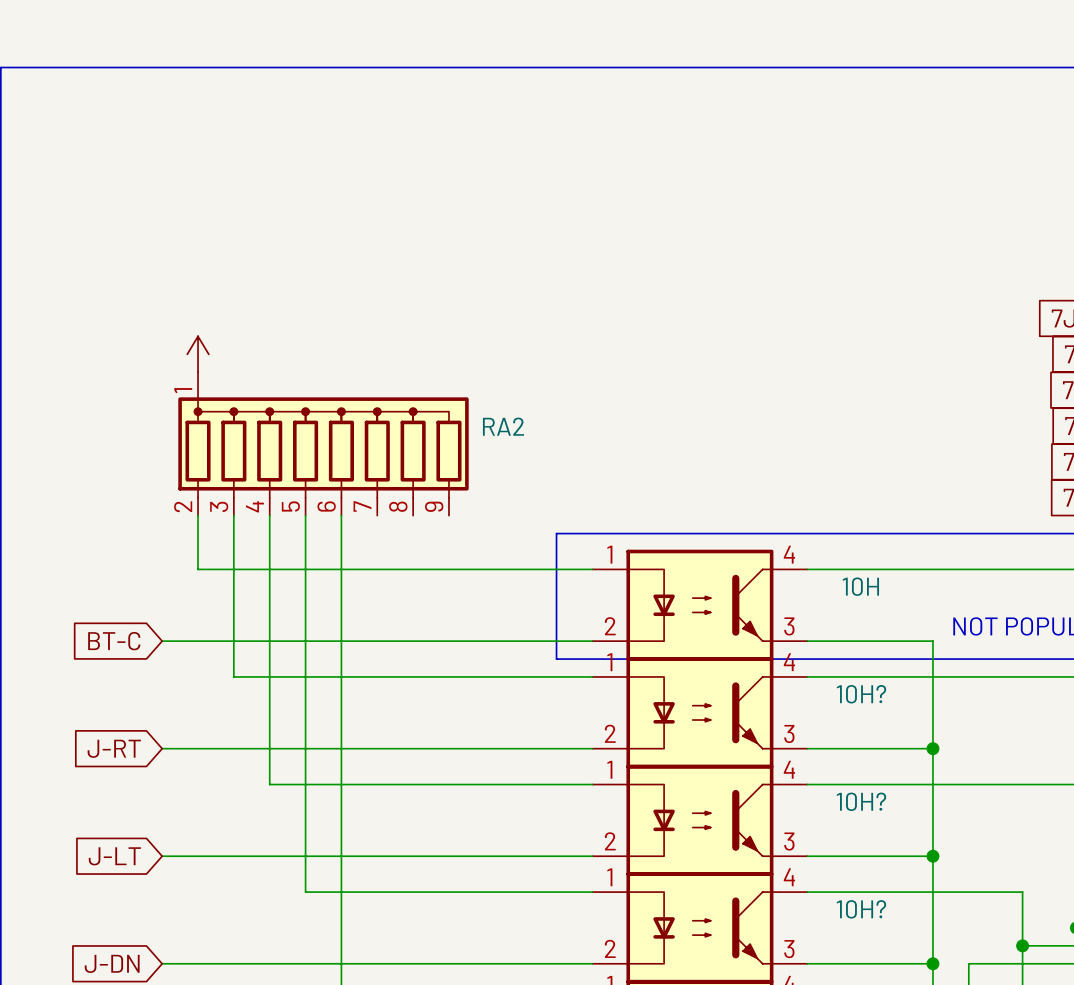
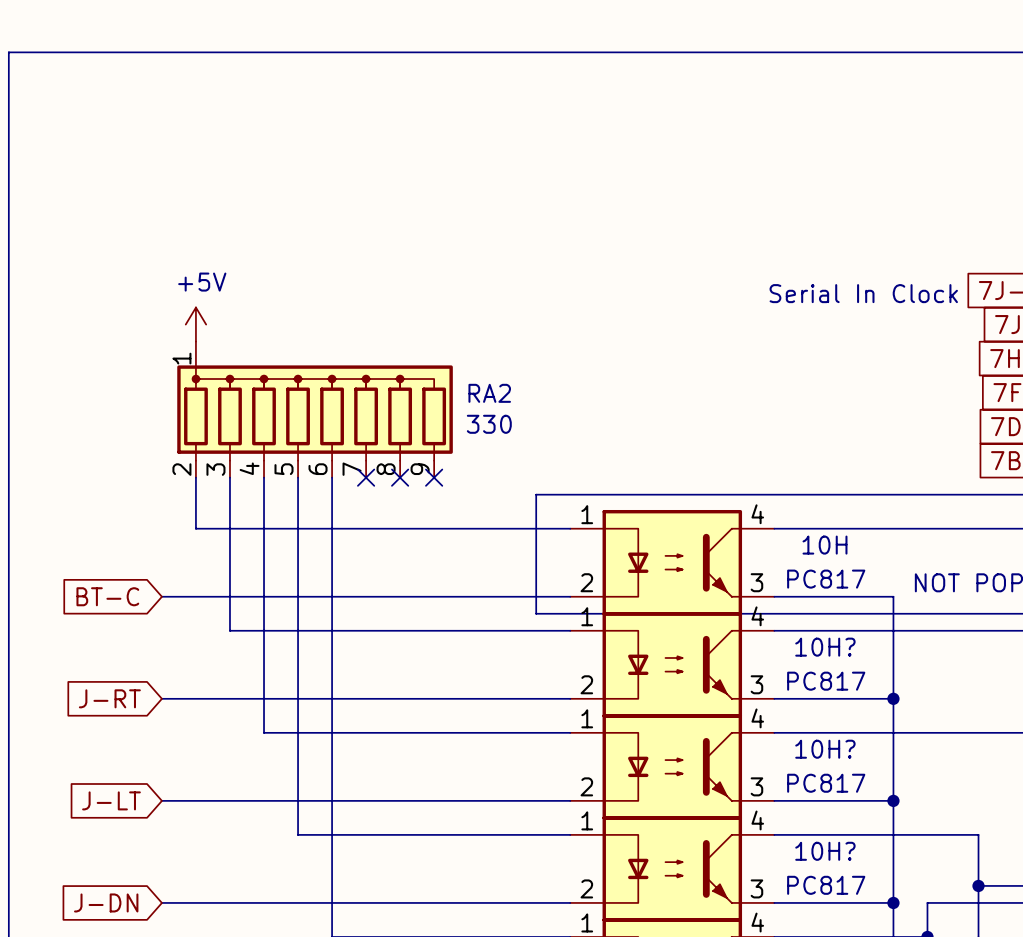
power symbol text: none -> +5V (202, 282)
text: none -> Serial In Clock (863, 293)
RA2 value: none -> 330 (489, 424)
no-connect mark: none -> (366, 477)
no-connect mark: none -> (400, 477)
no-connect mark: none -> (434, 477)
10H value: none -> PC817 (826, 579)
10H? value: none -> PC817 (826, 681)
10H? value: none -> PC817 (826, 783)
10H? value: none -> PC817 (826, 885)

